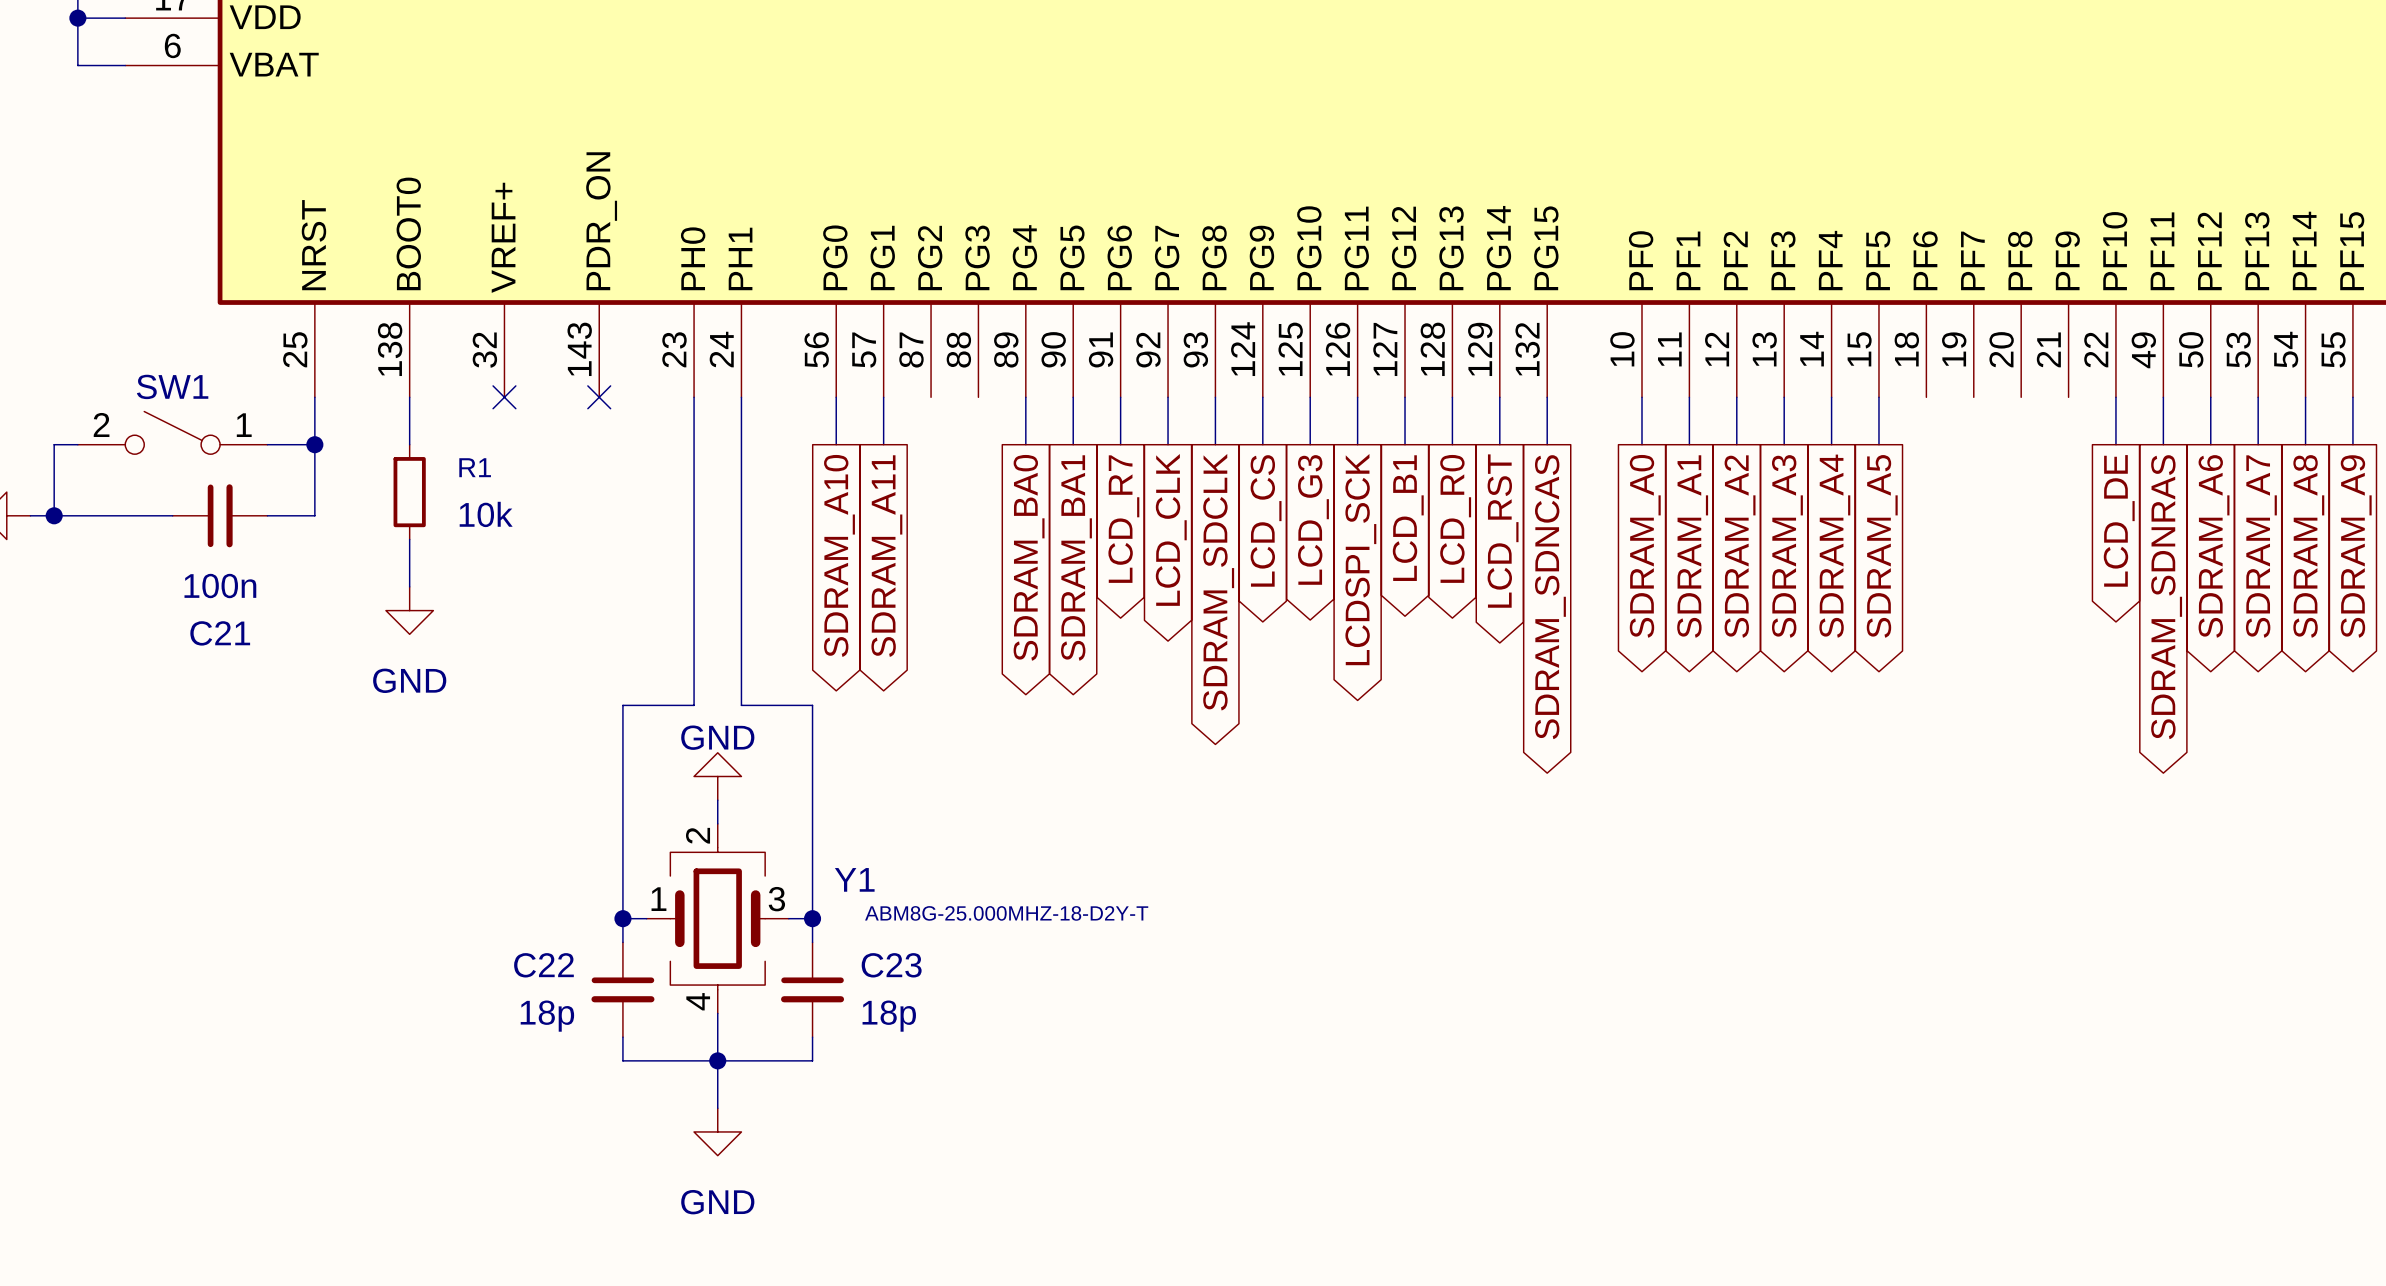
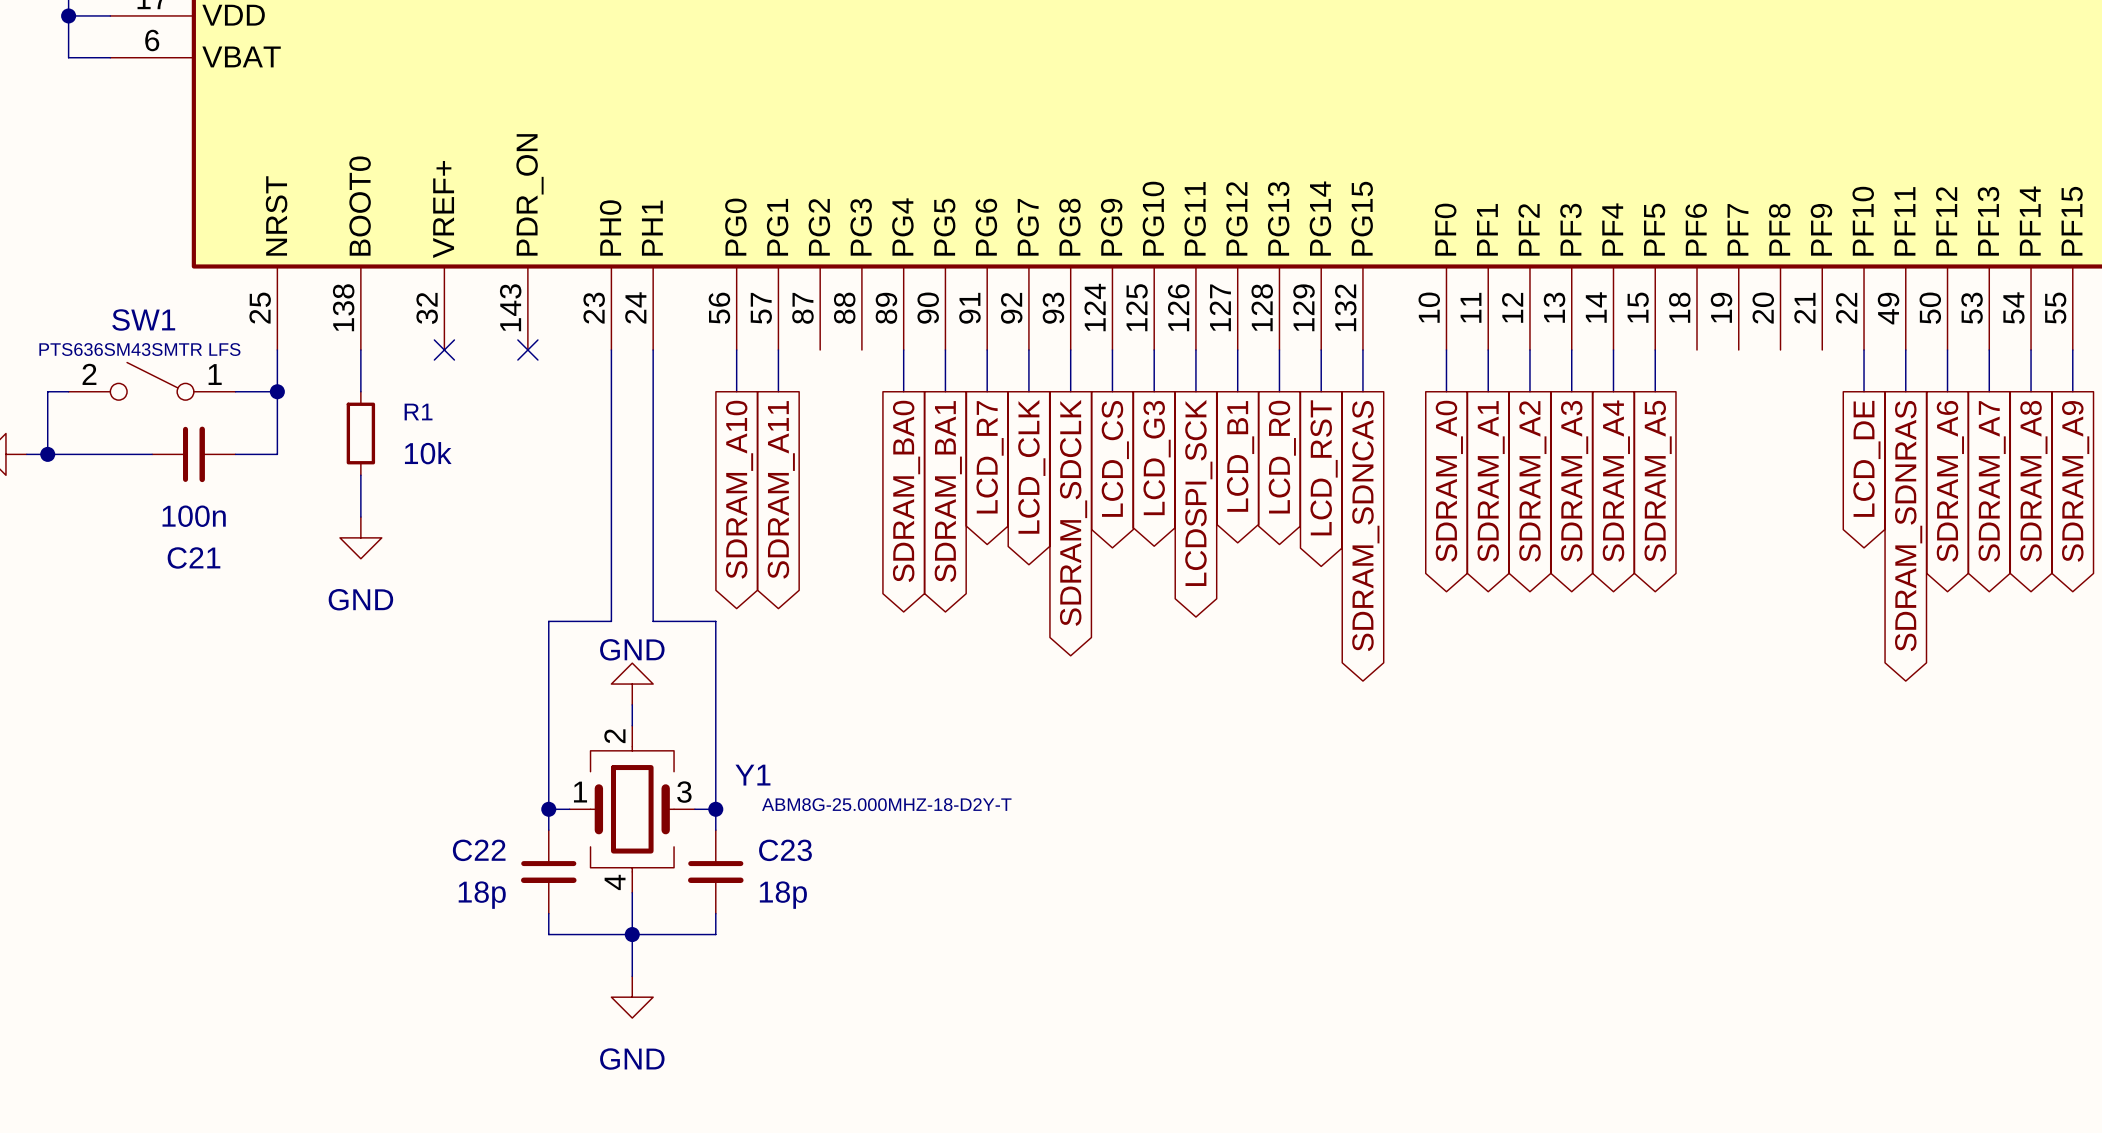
SW1 name position: SW1 (172, 386) -> SW1 (143, 319)
SW1 value: none -> PTS636SM43SMTR LFS (139, 349)

